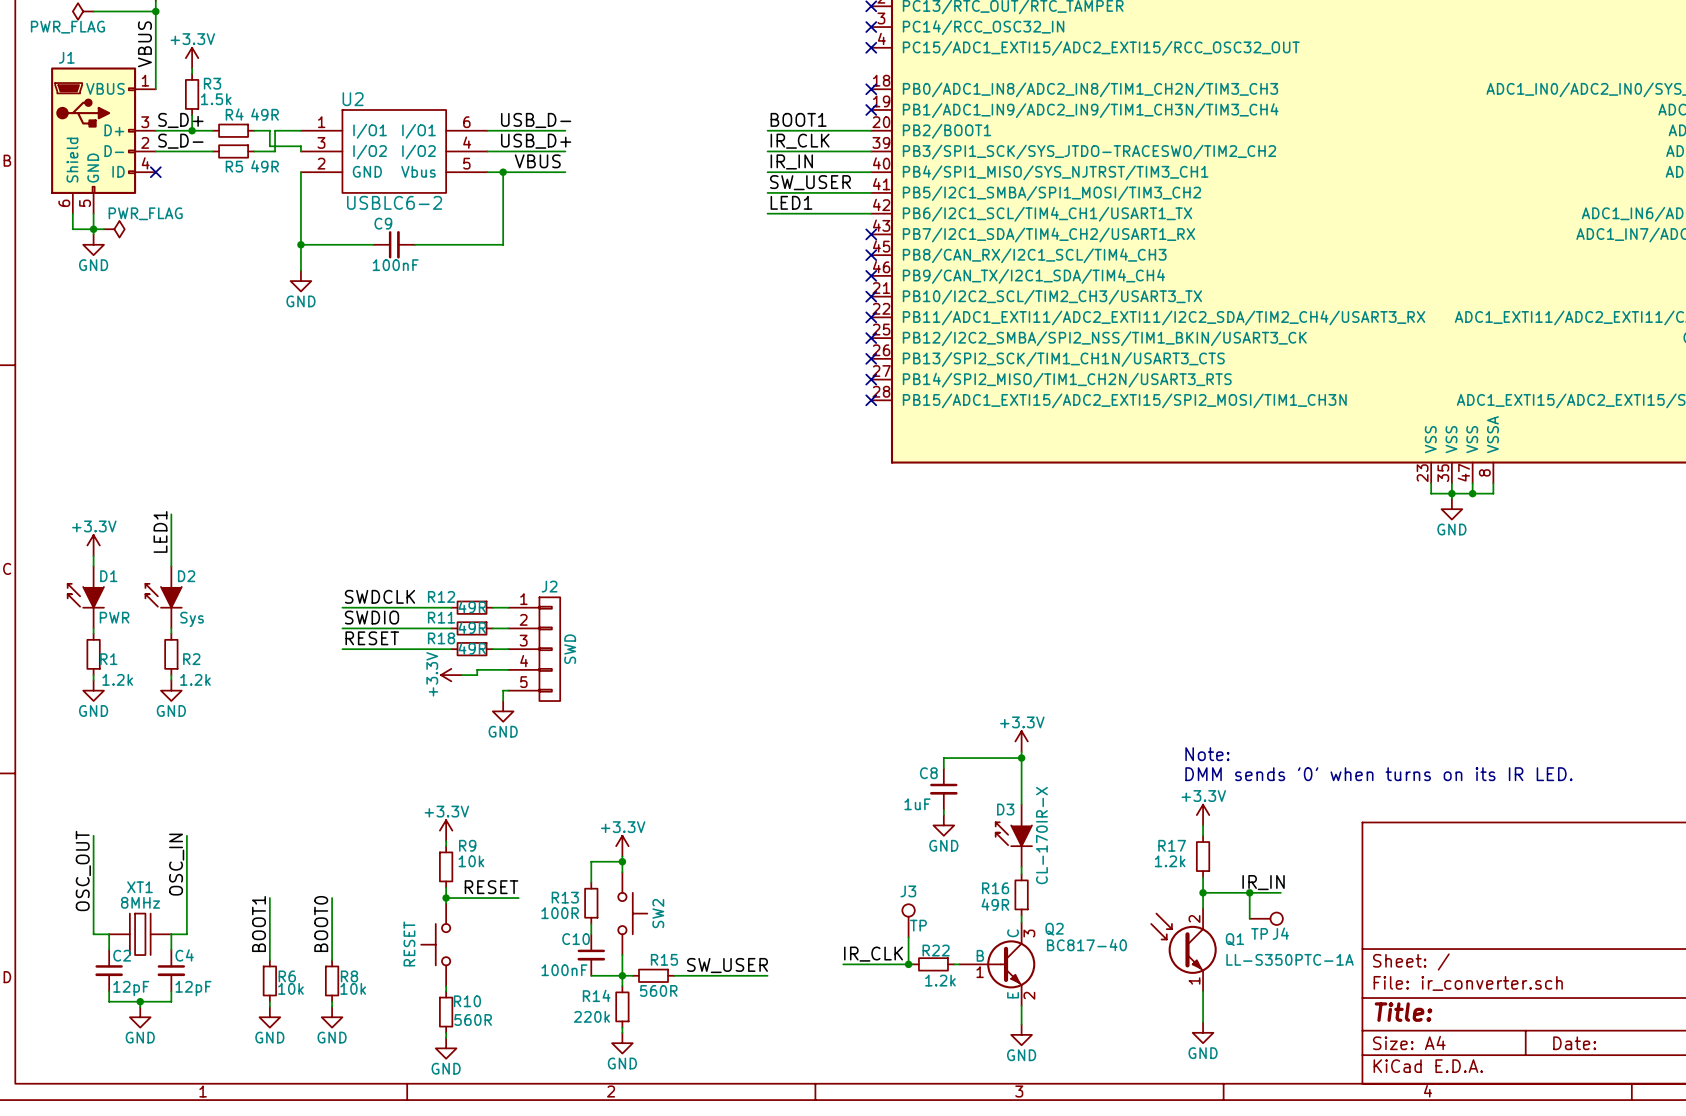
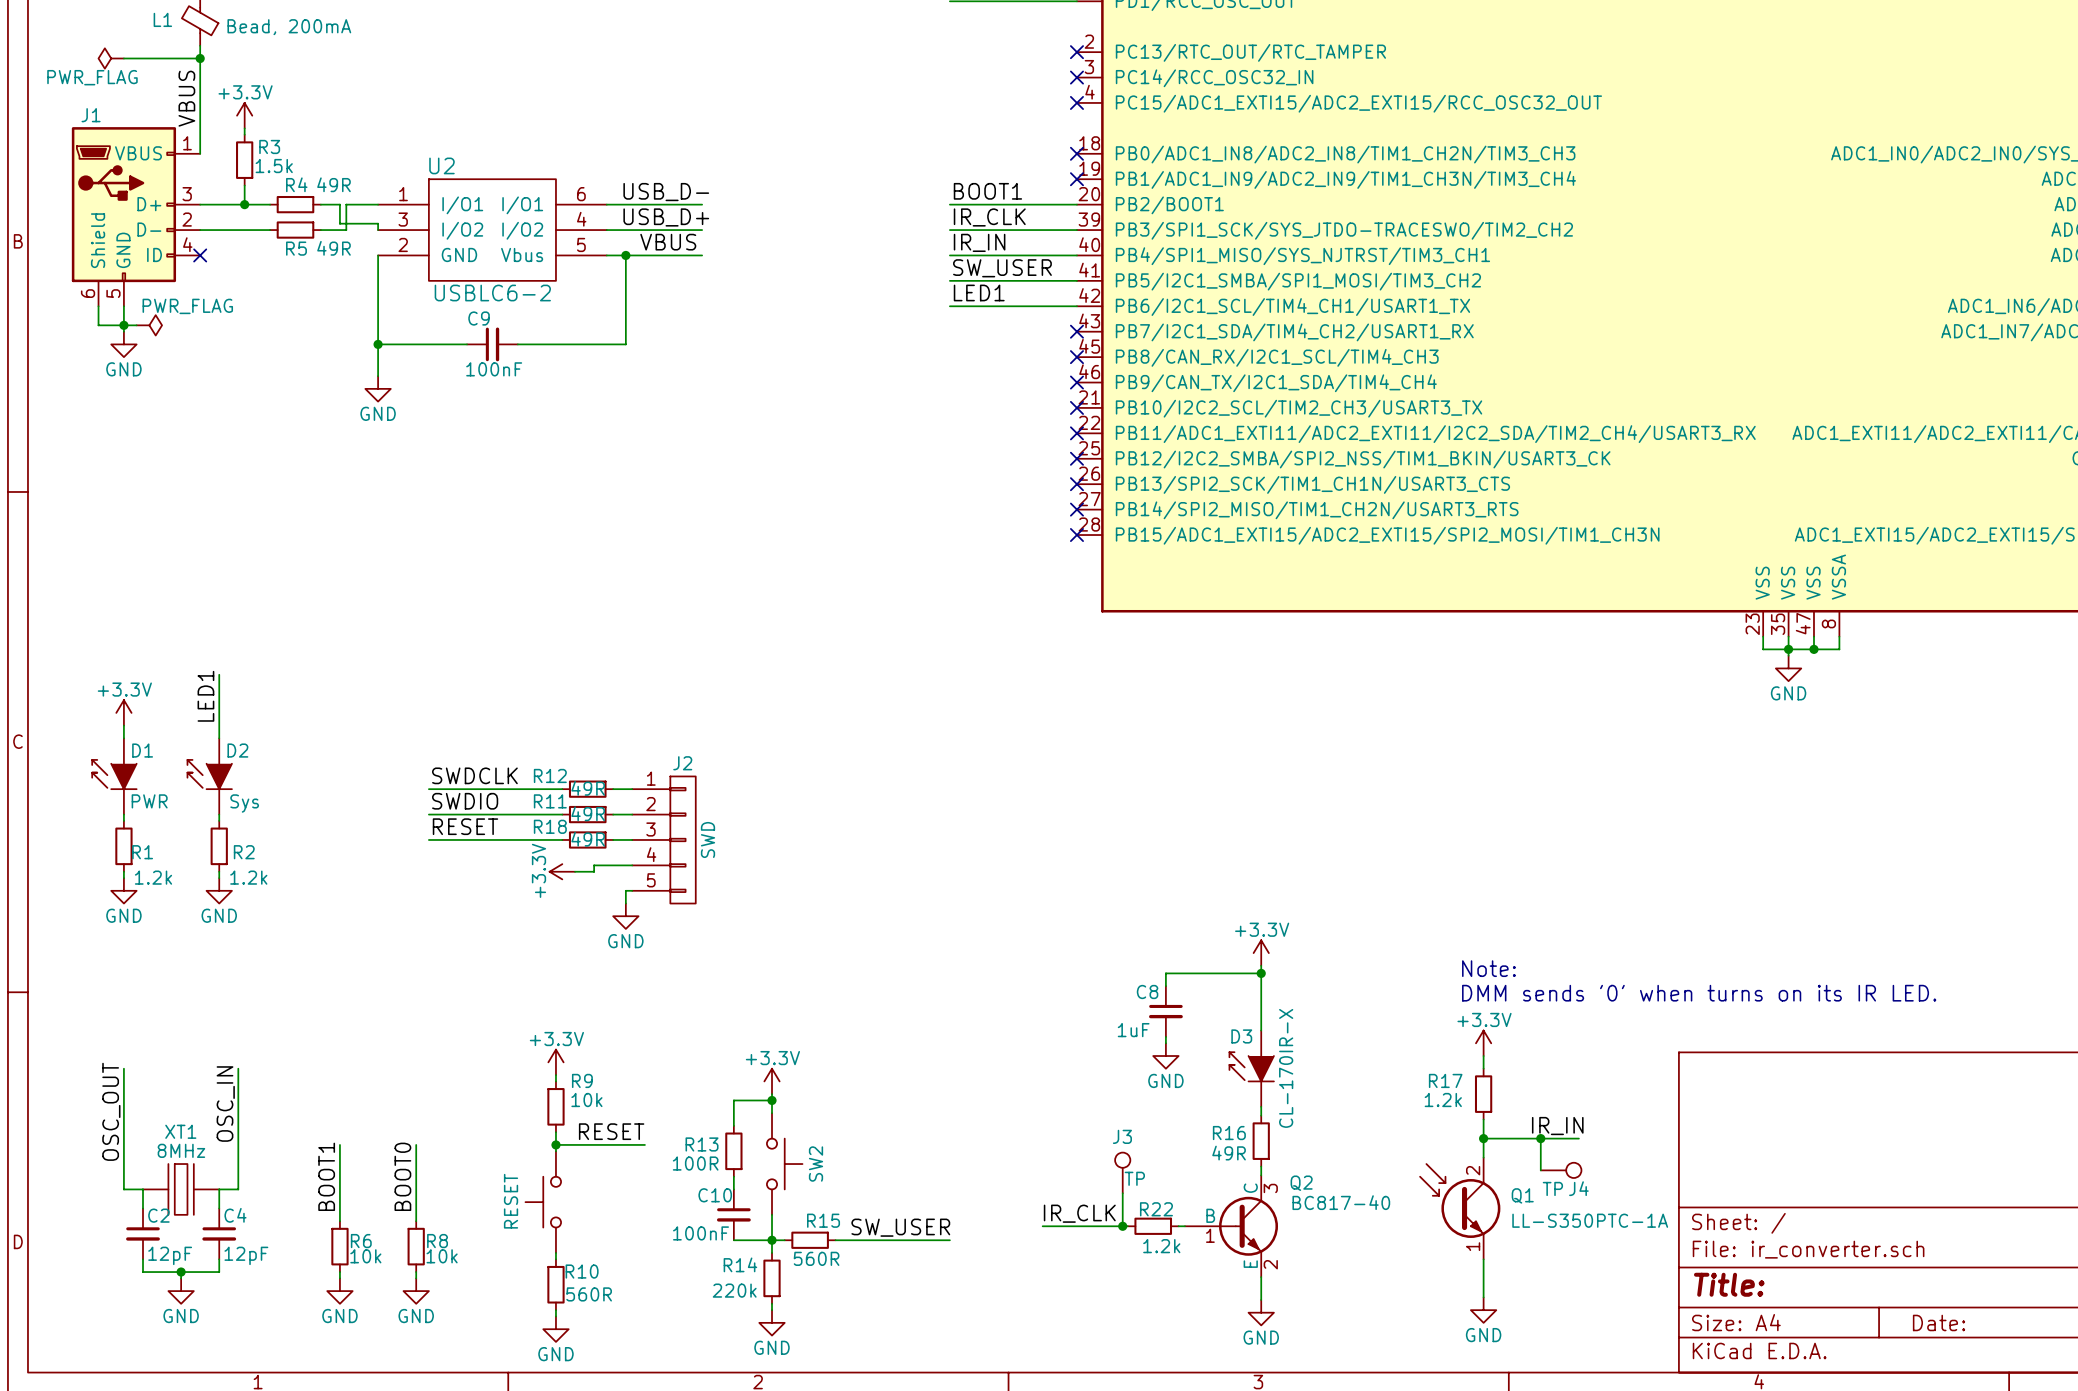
label: S_D+ (180, 120) -> none
label: S_D- (180, 141) -> none

